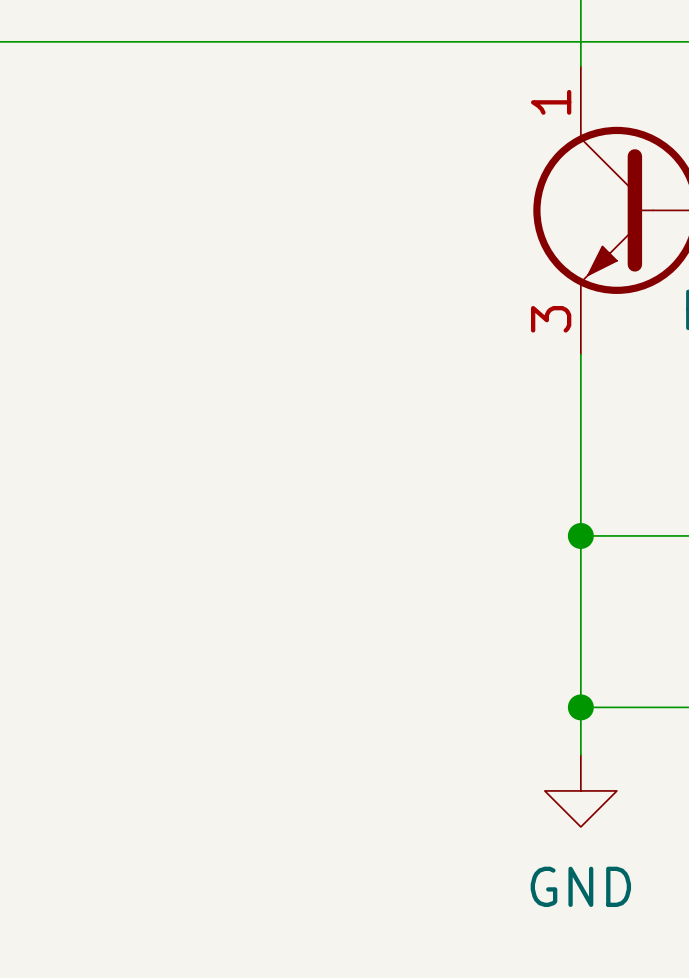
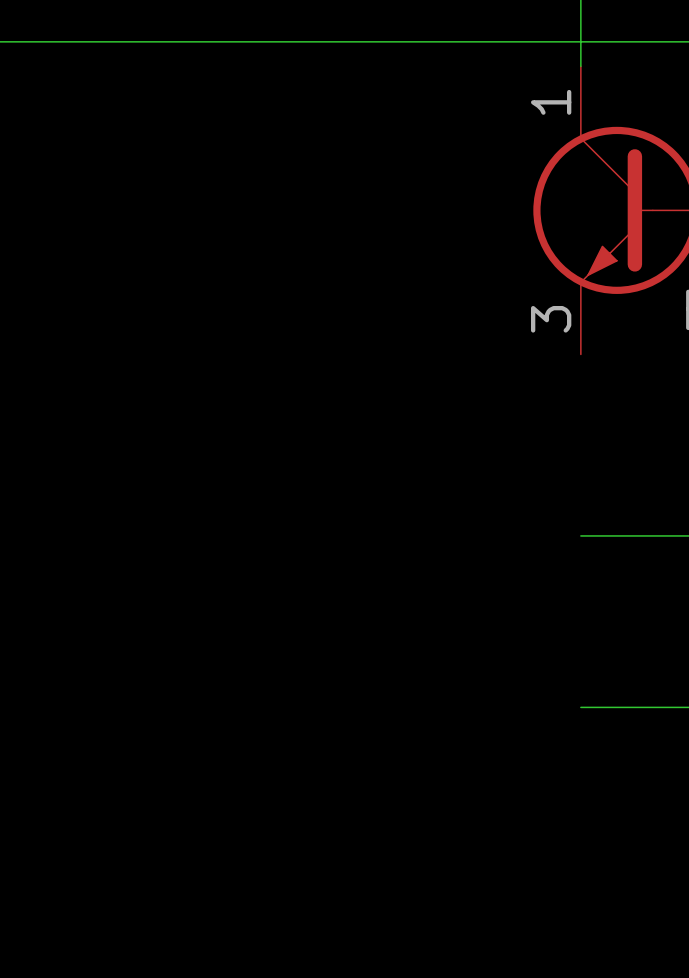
wire: (580, 354) (580, 754) -> none
junction: (580, 535) -> none
junction: (580, 707) -> none
power symbol: GND (580, 790) -> none

